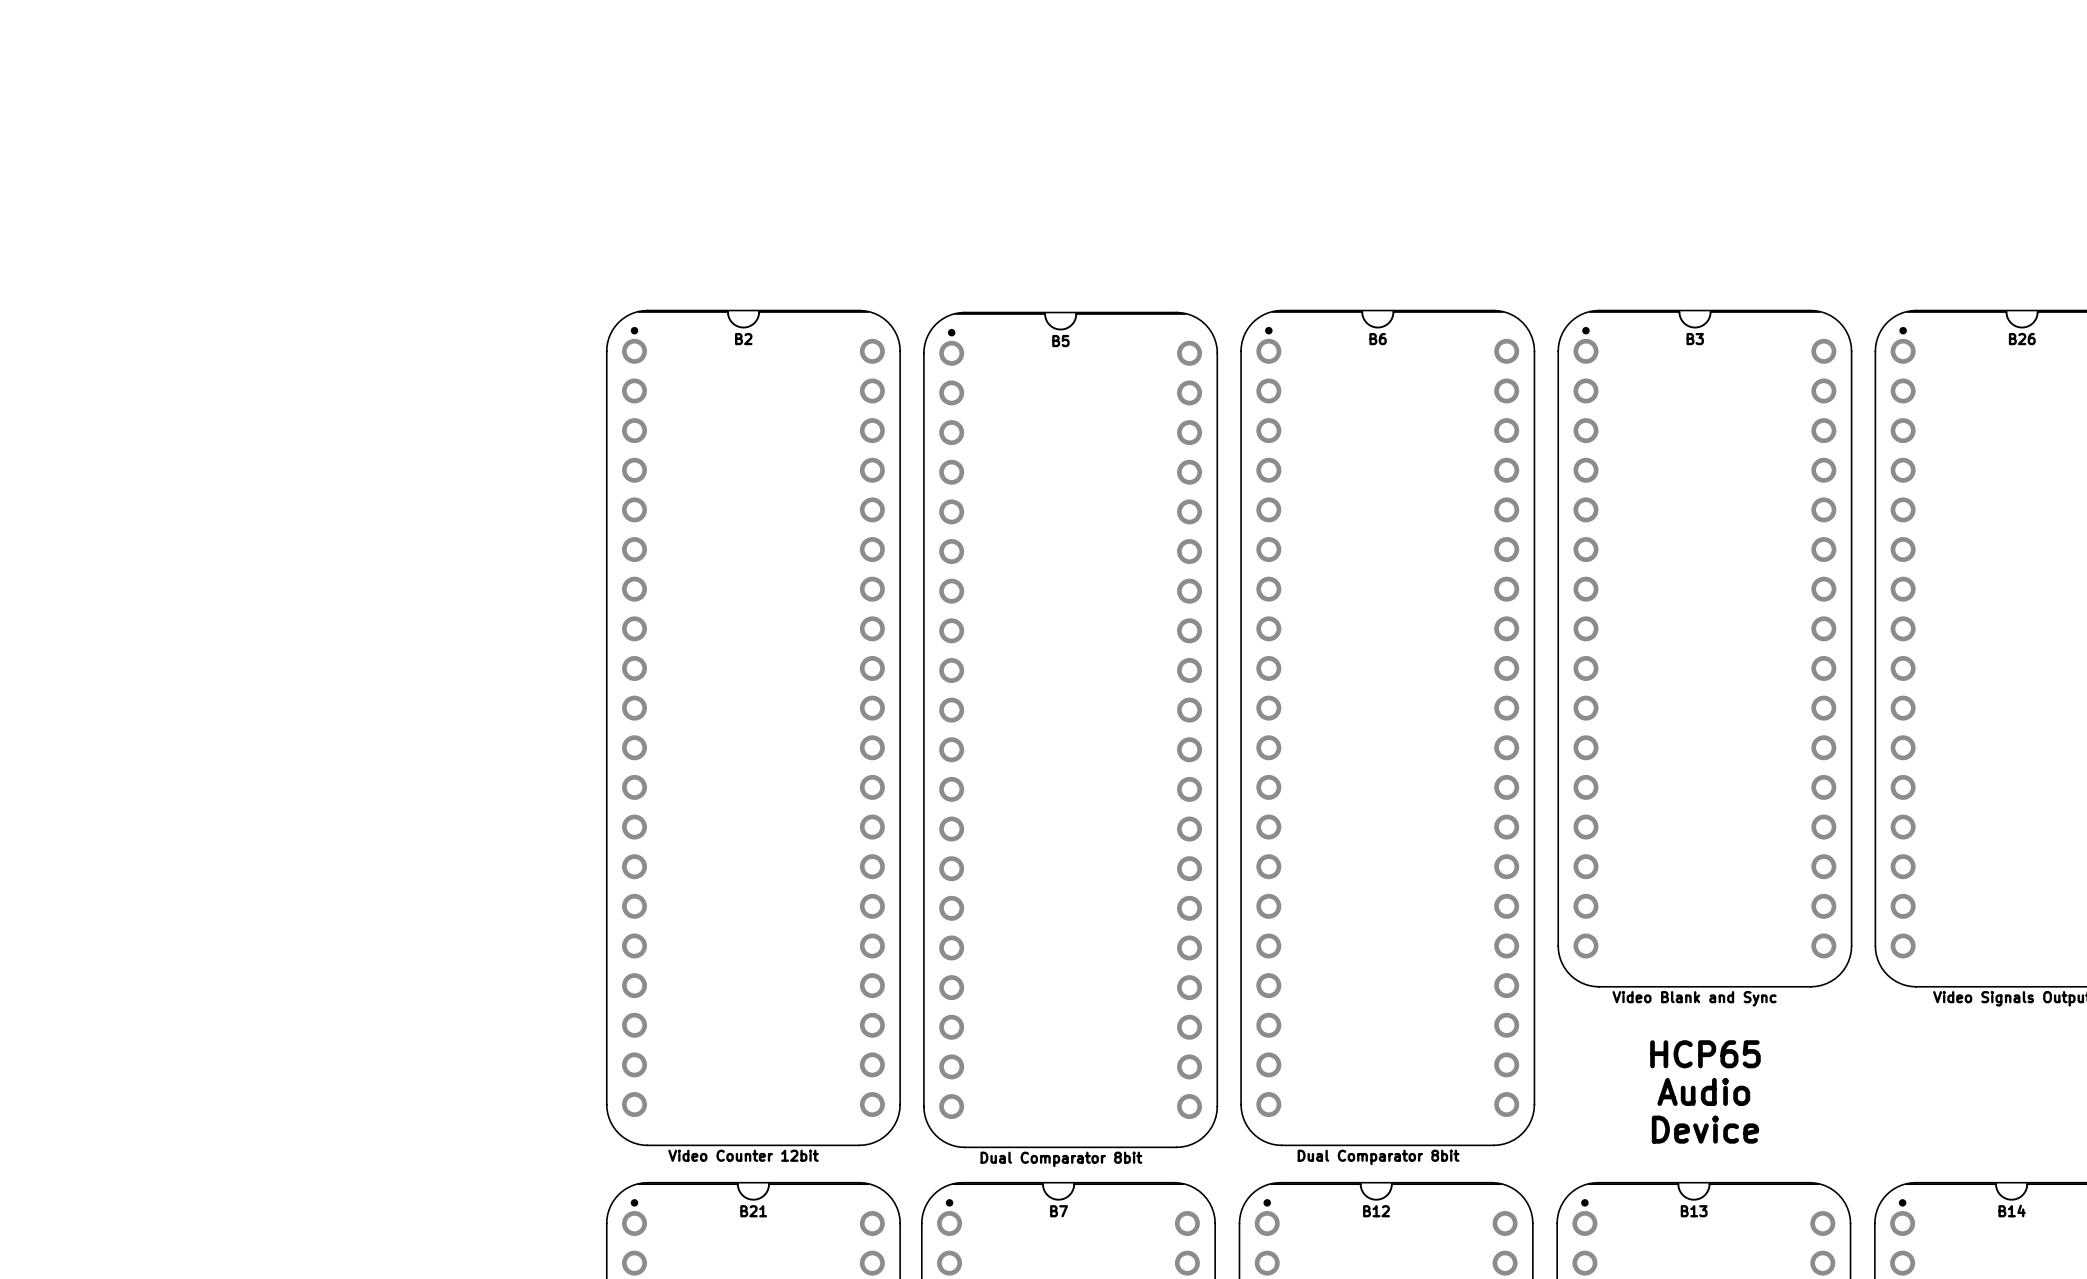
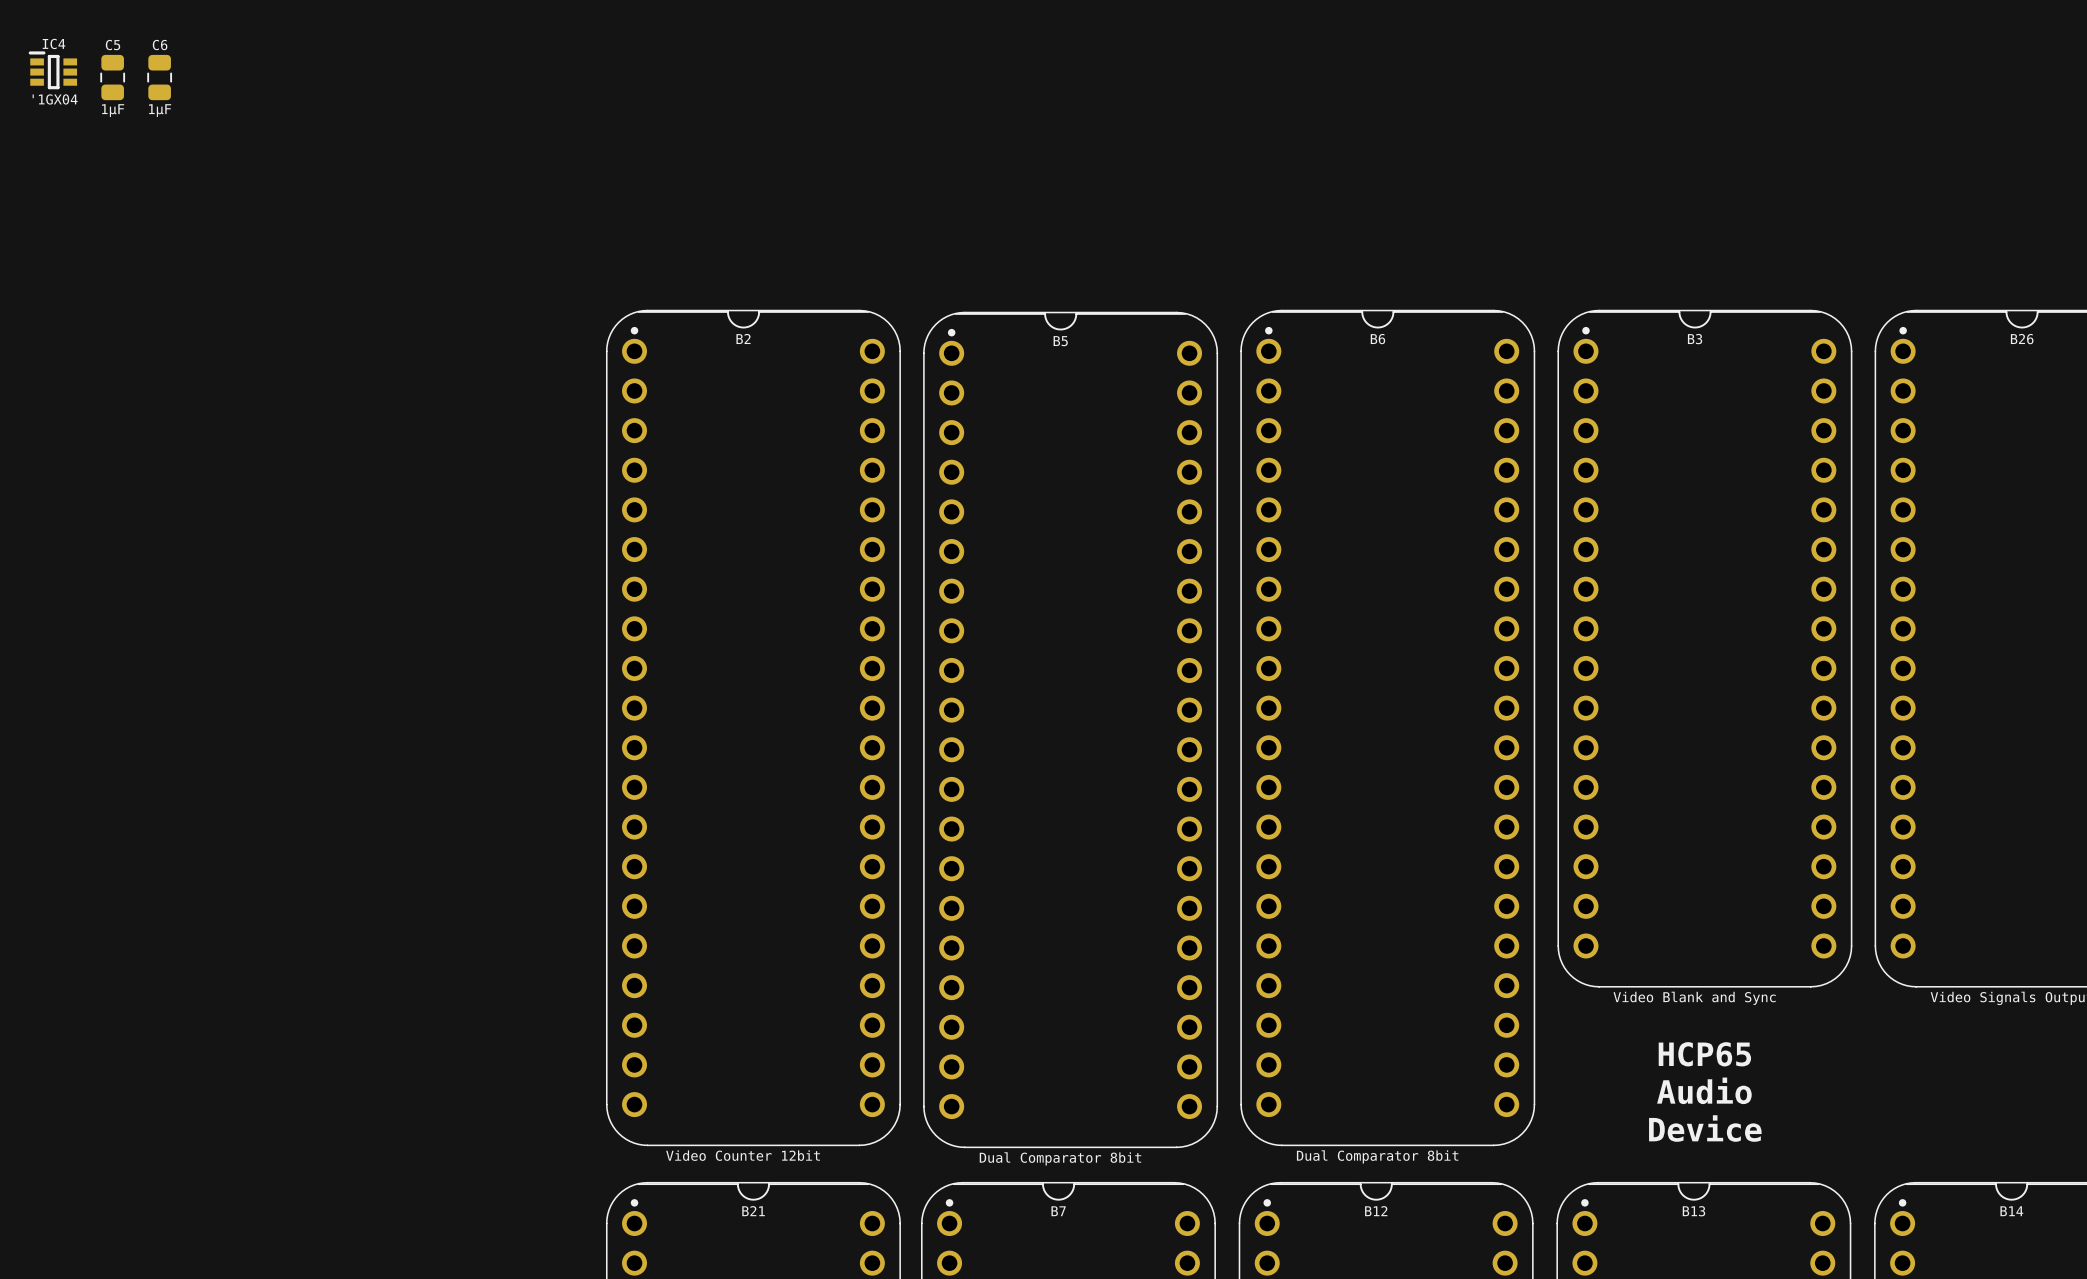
IC4: none -> (52, 70)
C5: none -> 1μF (112, 77)
C6: none -> 1μF (159, 77)

